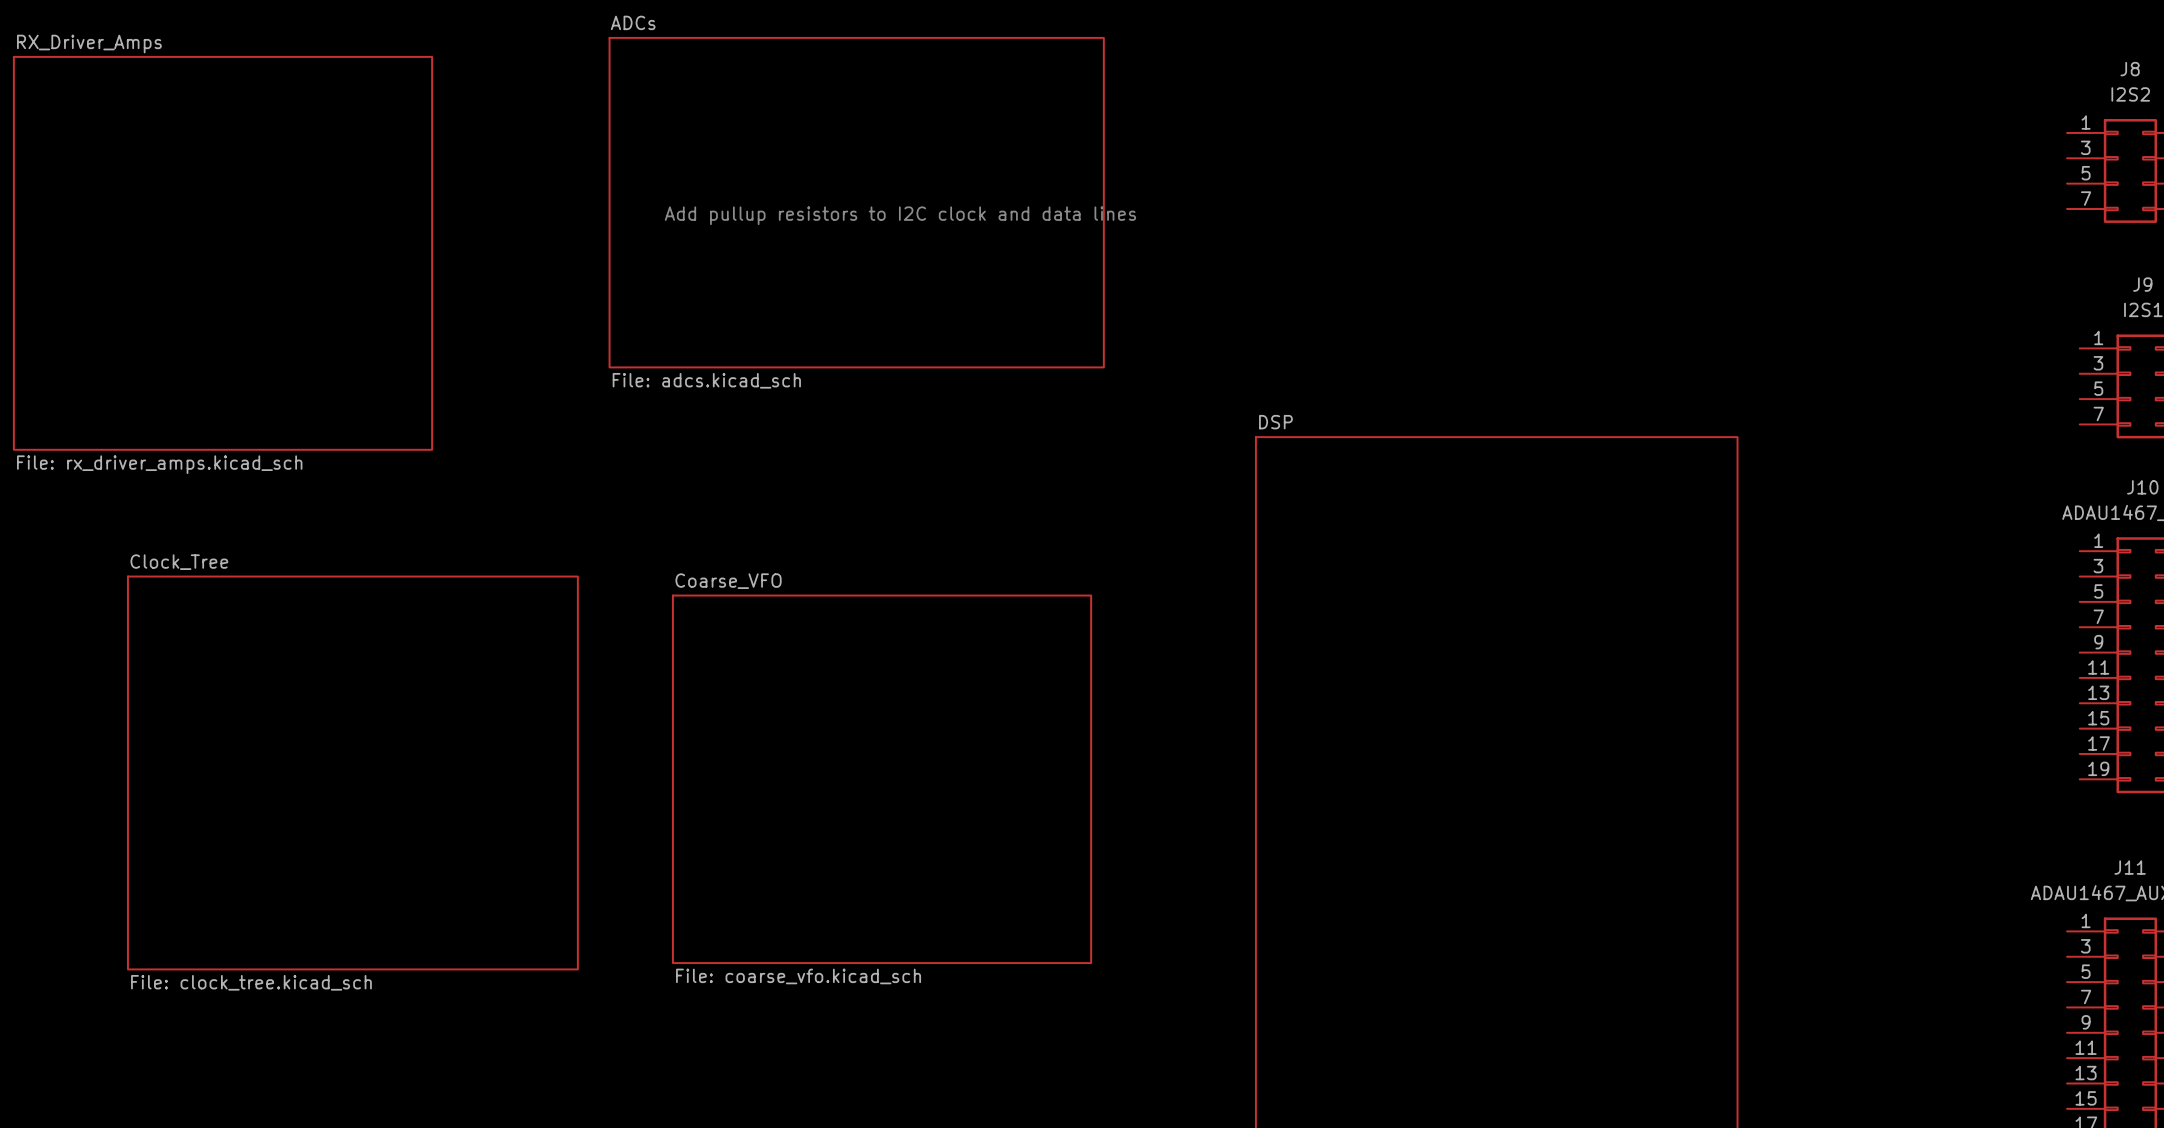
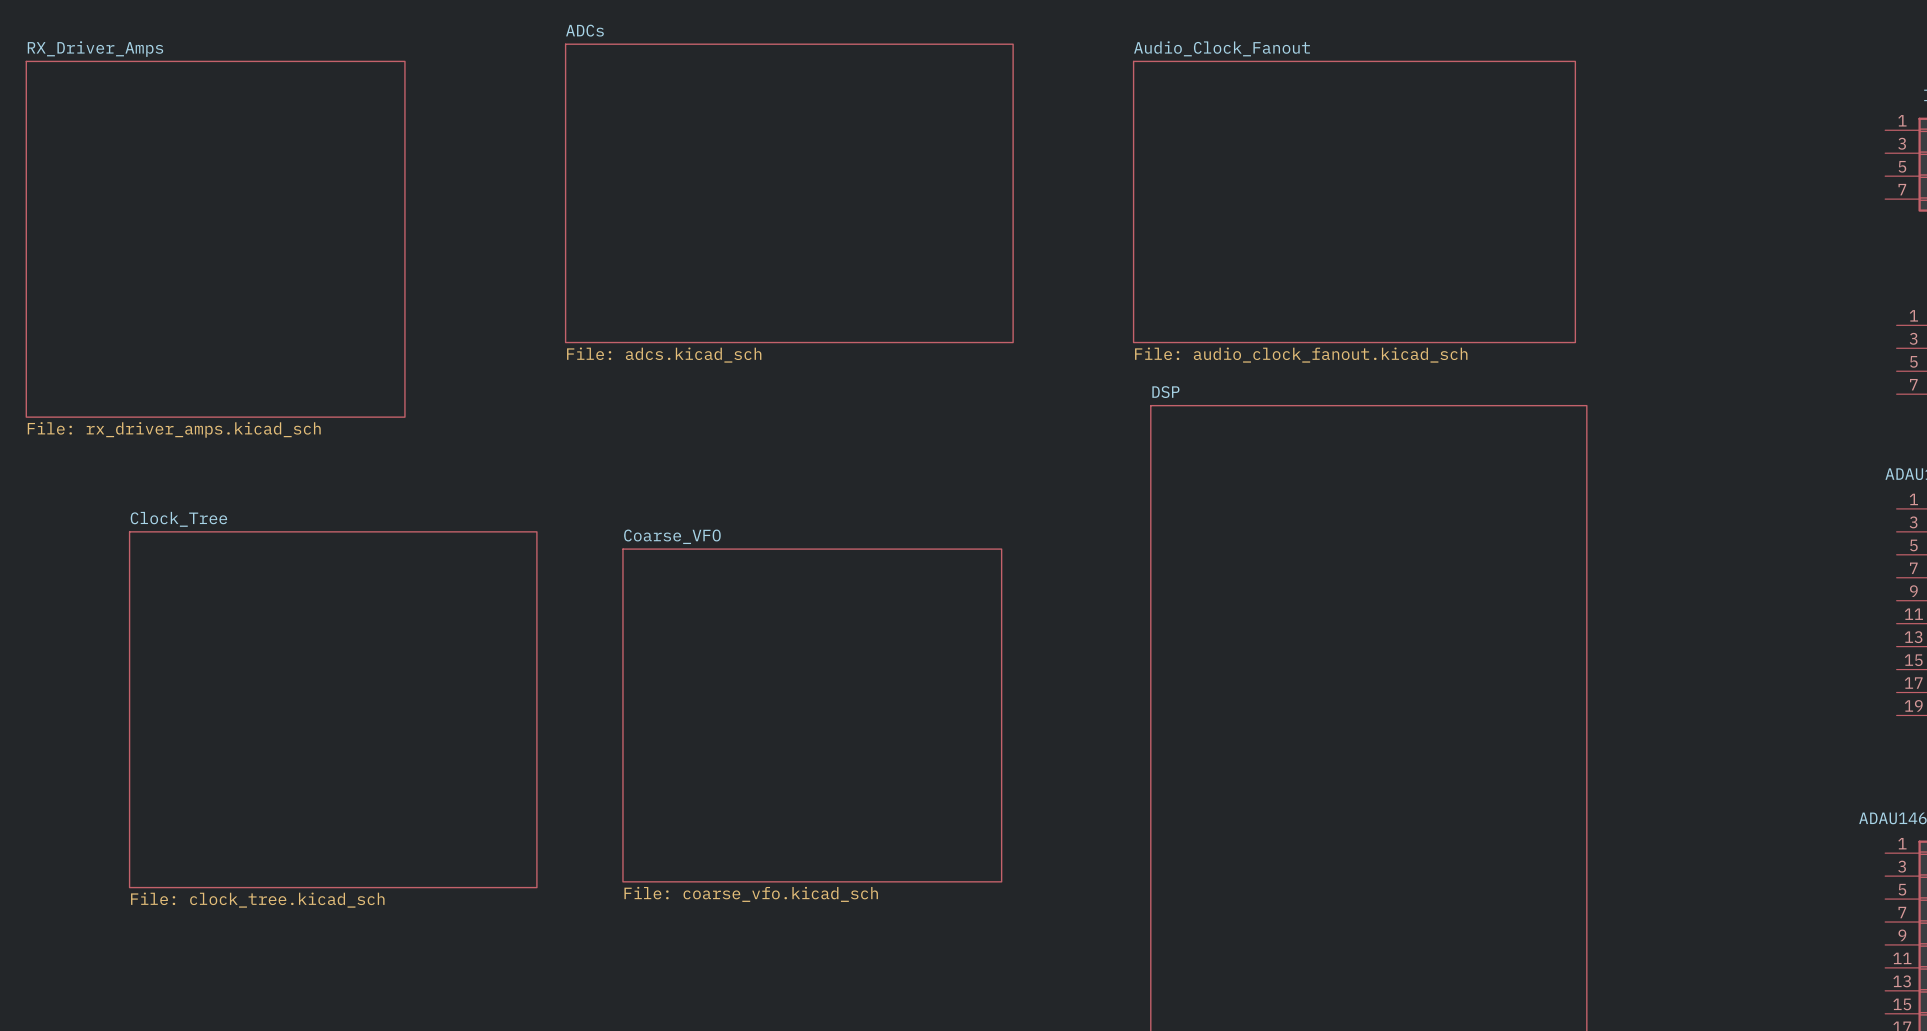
sheet Audio_Clock_Fanout: none -> File: audio_clock_fanout.kicad_sch (1354, 201)
text: Add pullup resistors to I2C clock and data lines (900, 215) -> none

